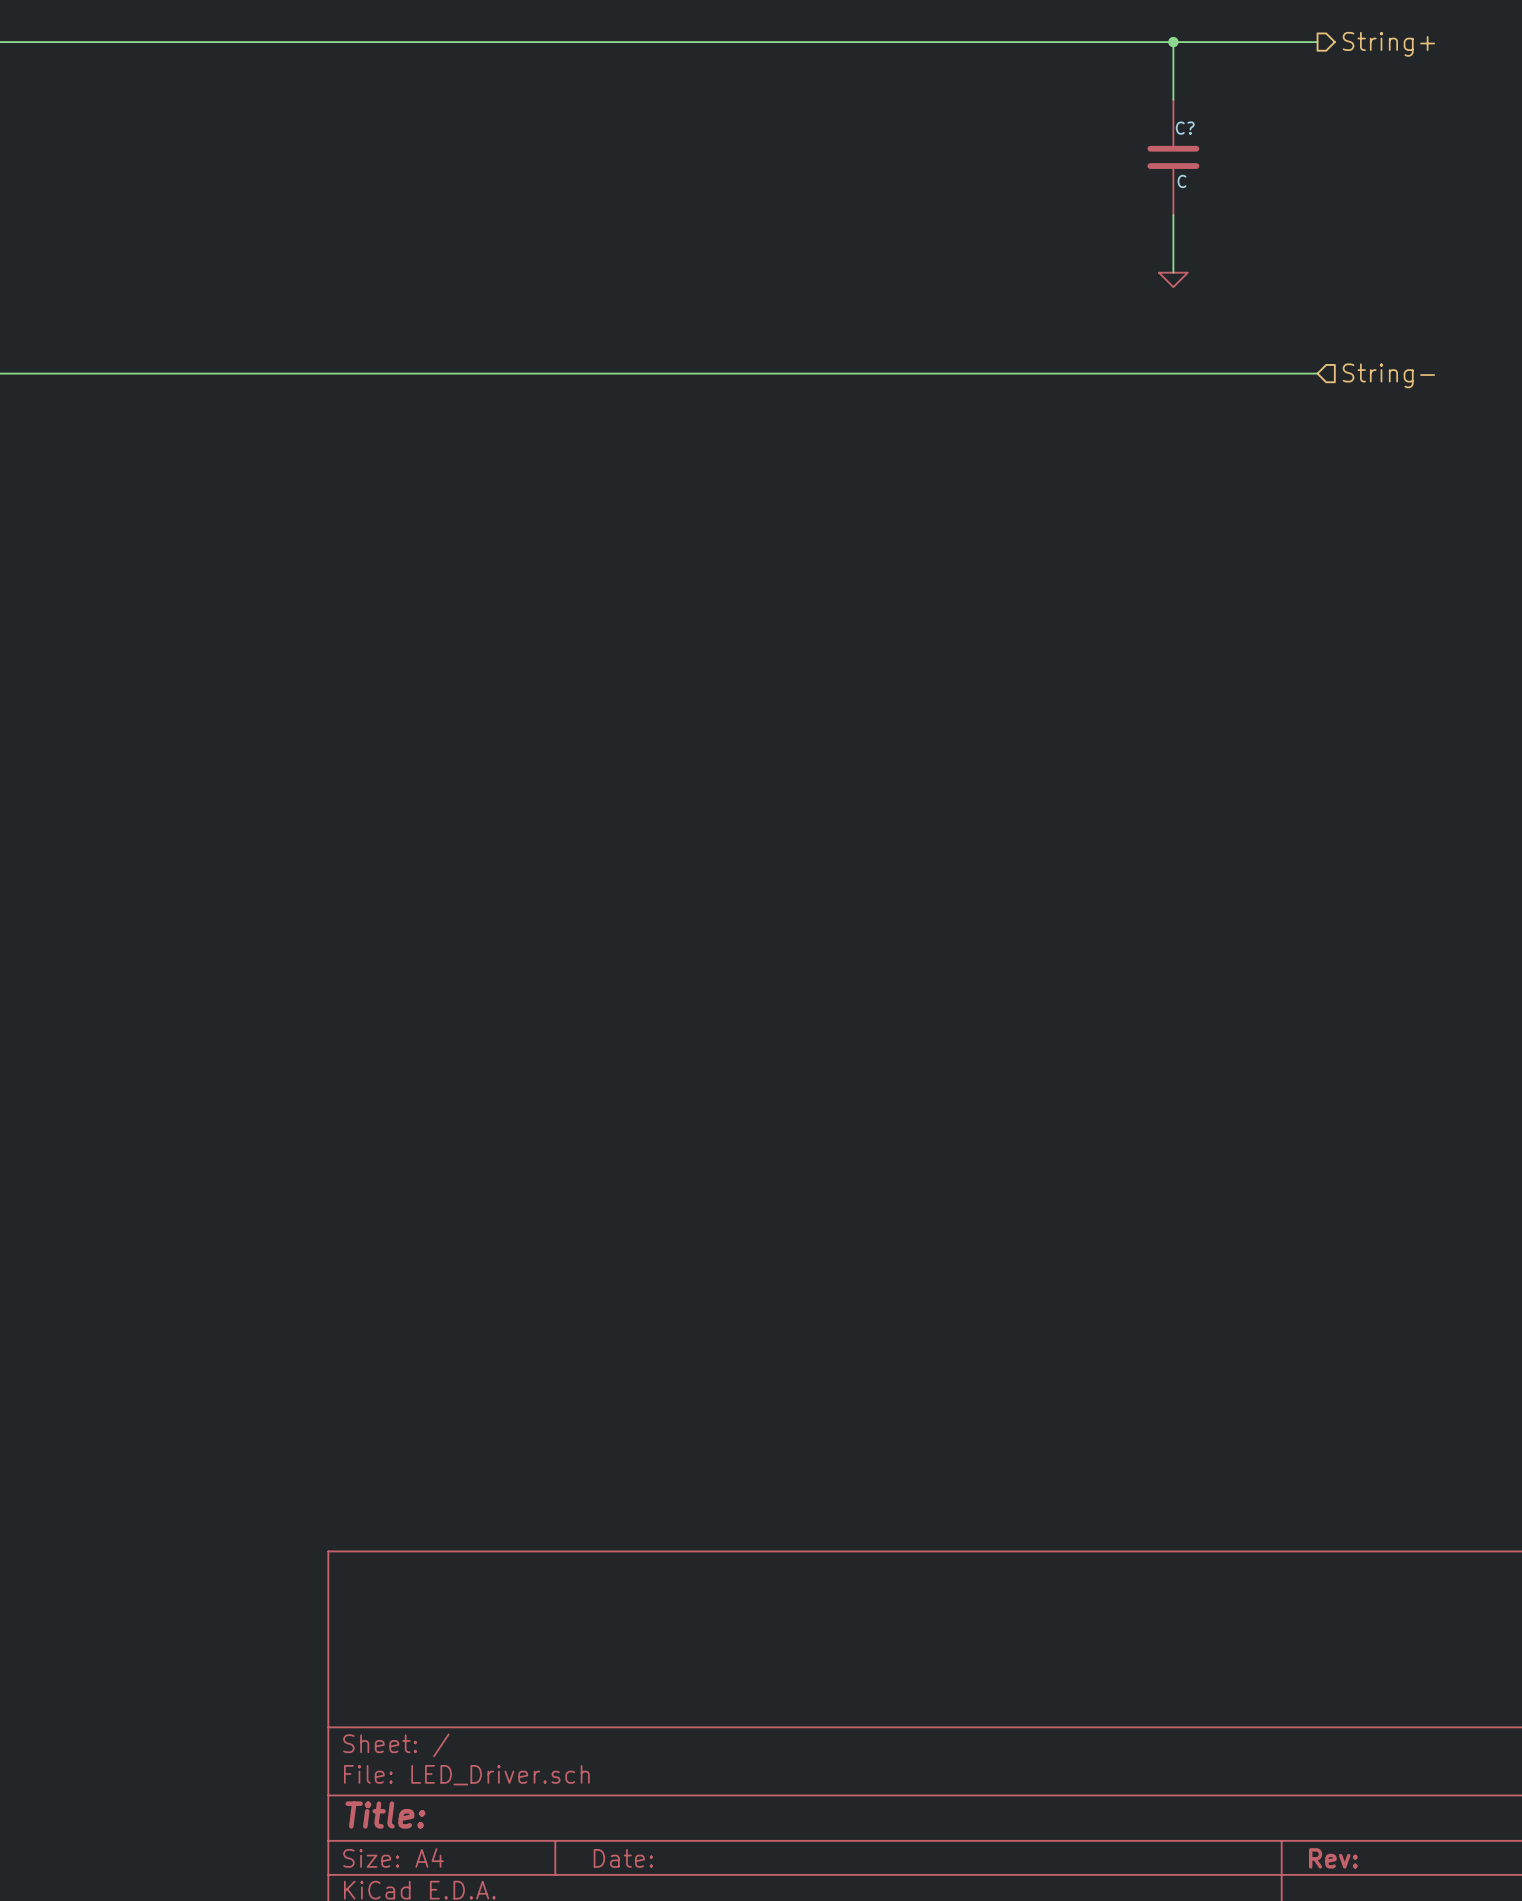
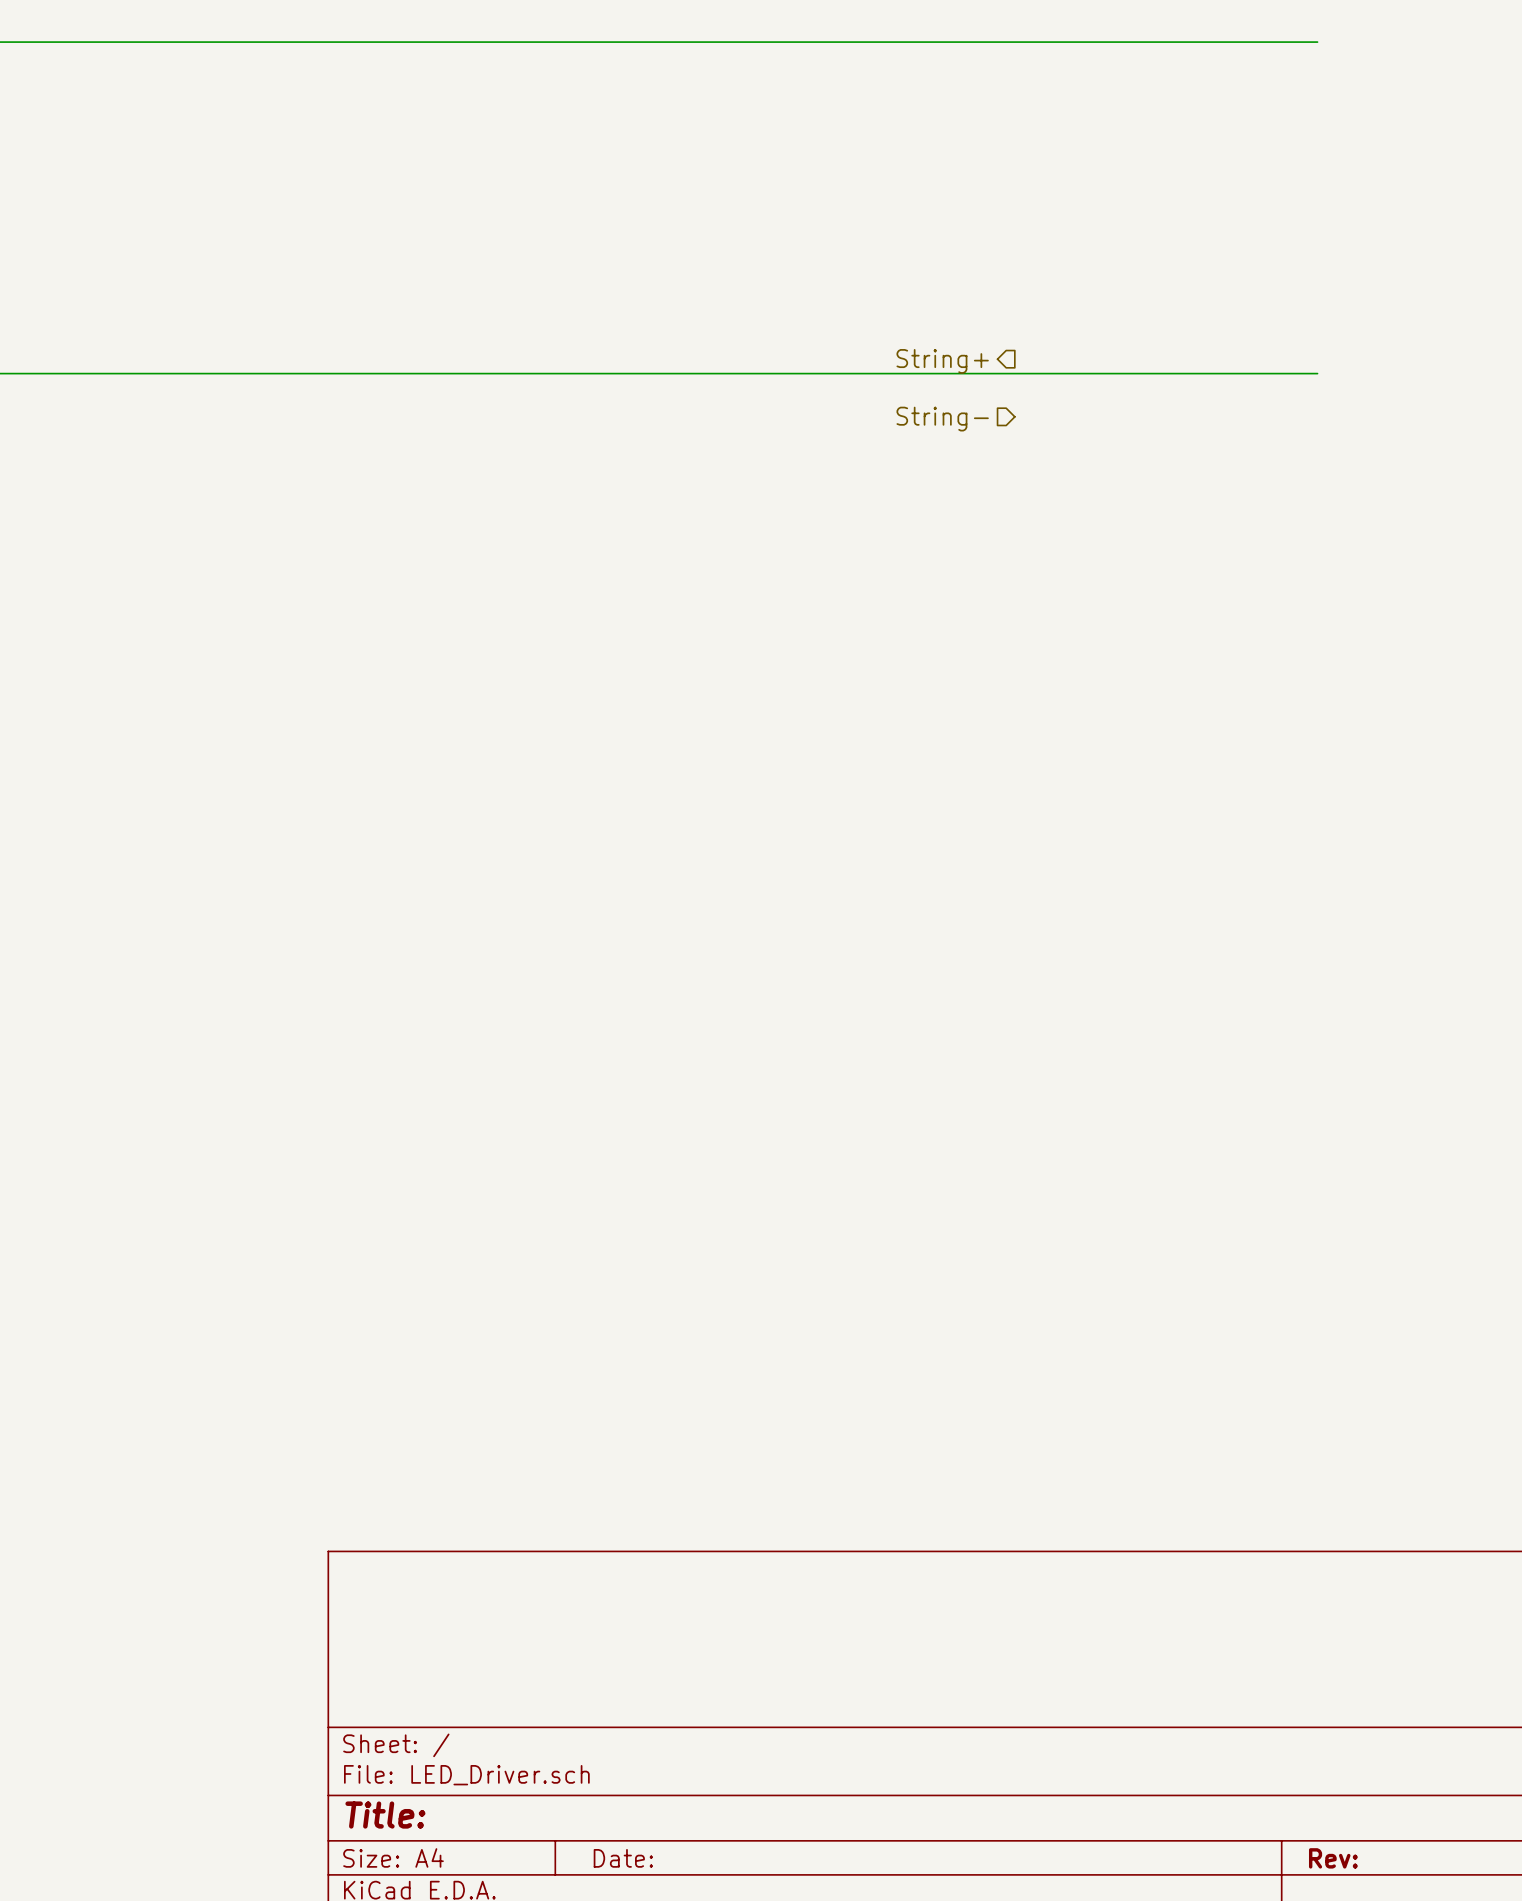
wire: (1173, 42) (1173, 99) -> none
junction: (1173, 42) -> none
hierarchical label: String+ (1388, 44) -> none
C?: C (1173, 157) -> none
wire: (1173, 215) (1173, 272) -> none
power symbol: (1173, 279) -> none
hierarchical label: none -> String+ (942, 361)
hierarchical label: String- (1388, 375) -> none
hierarchical label: none -> String- (942, 419)

